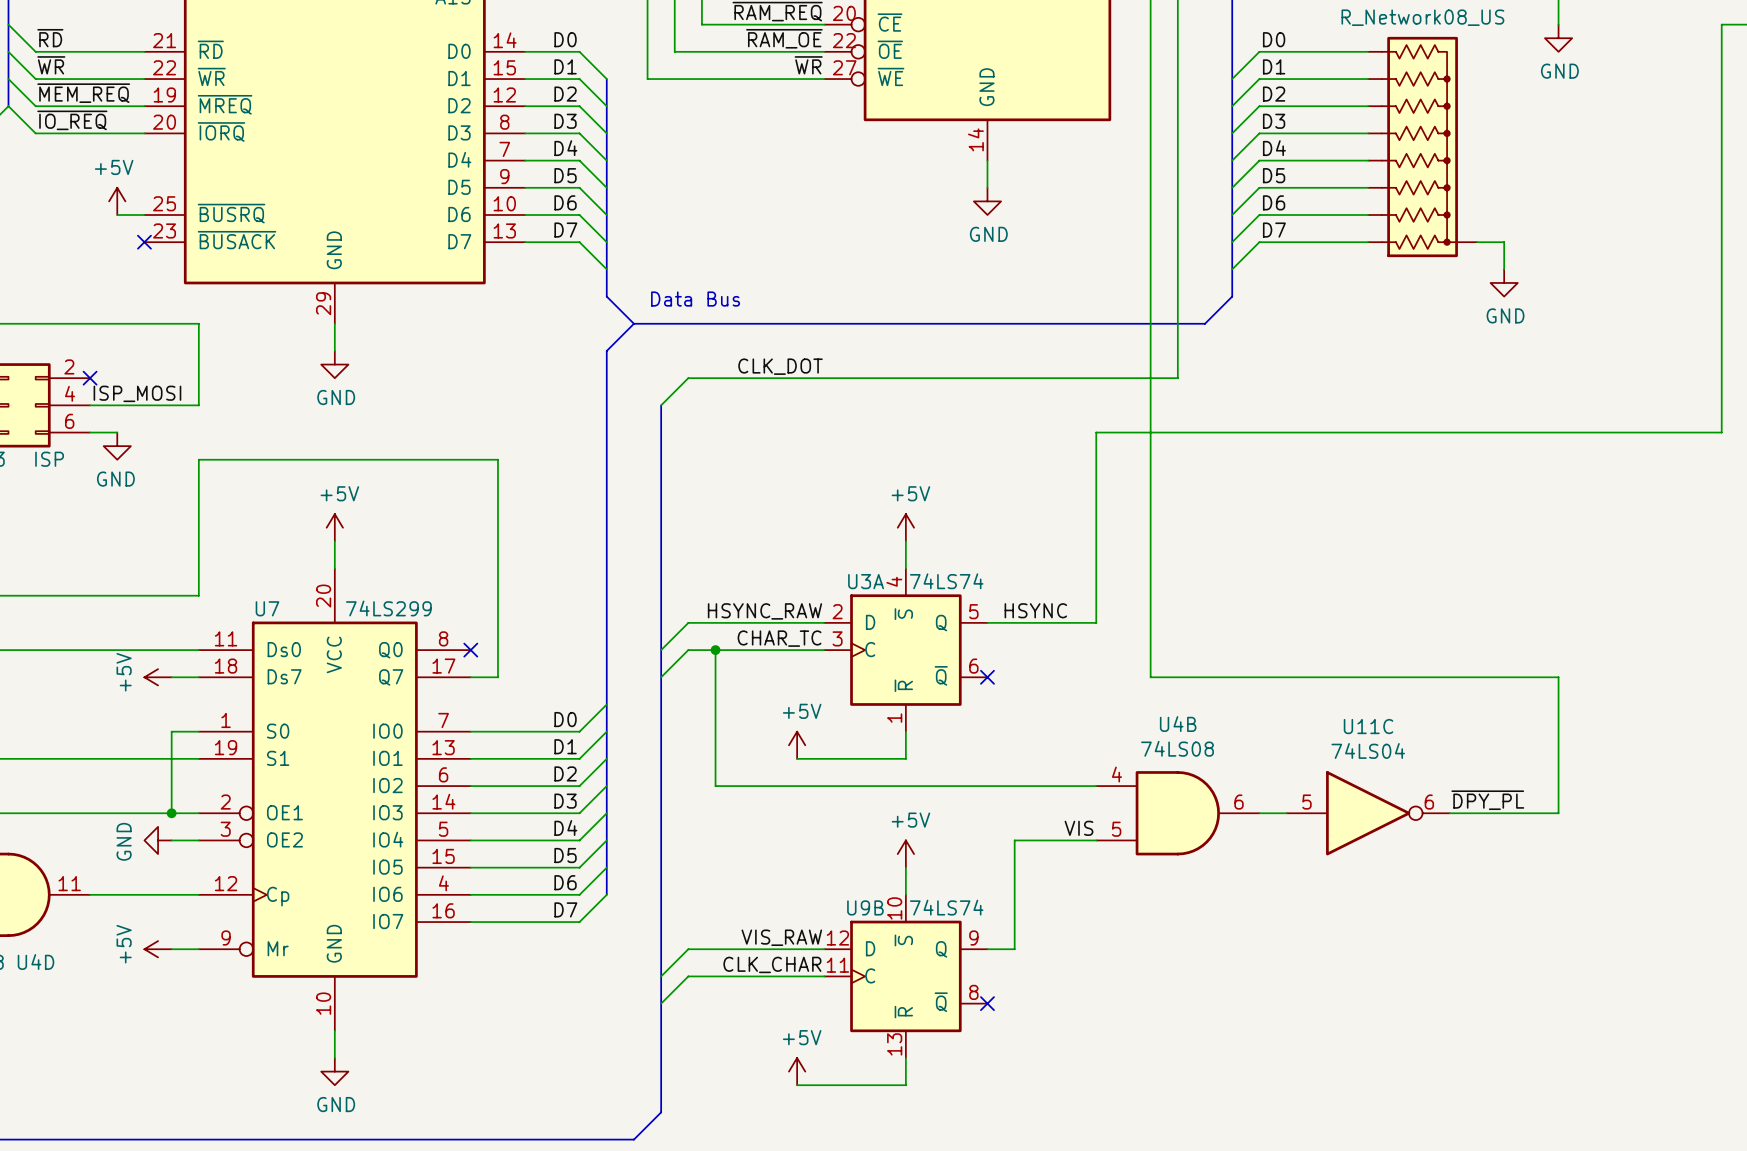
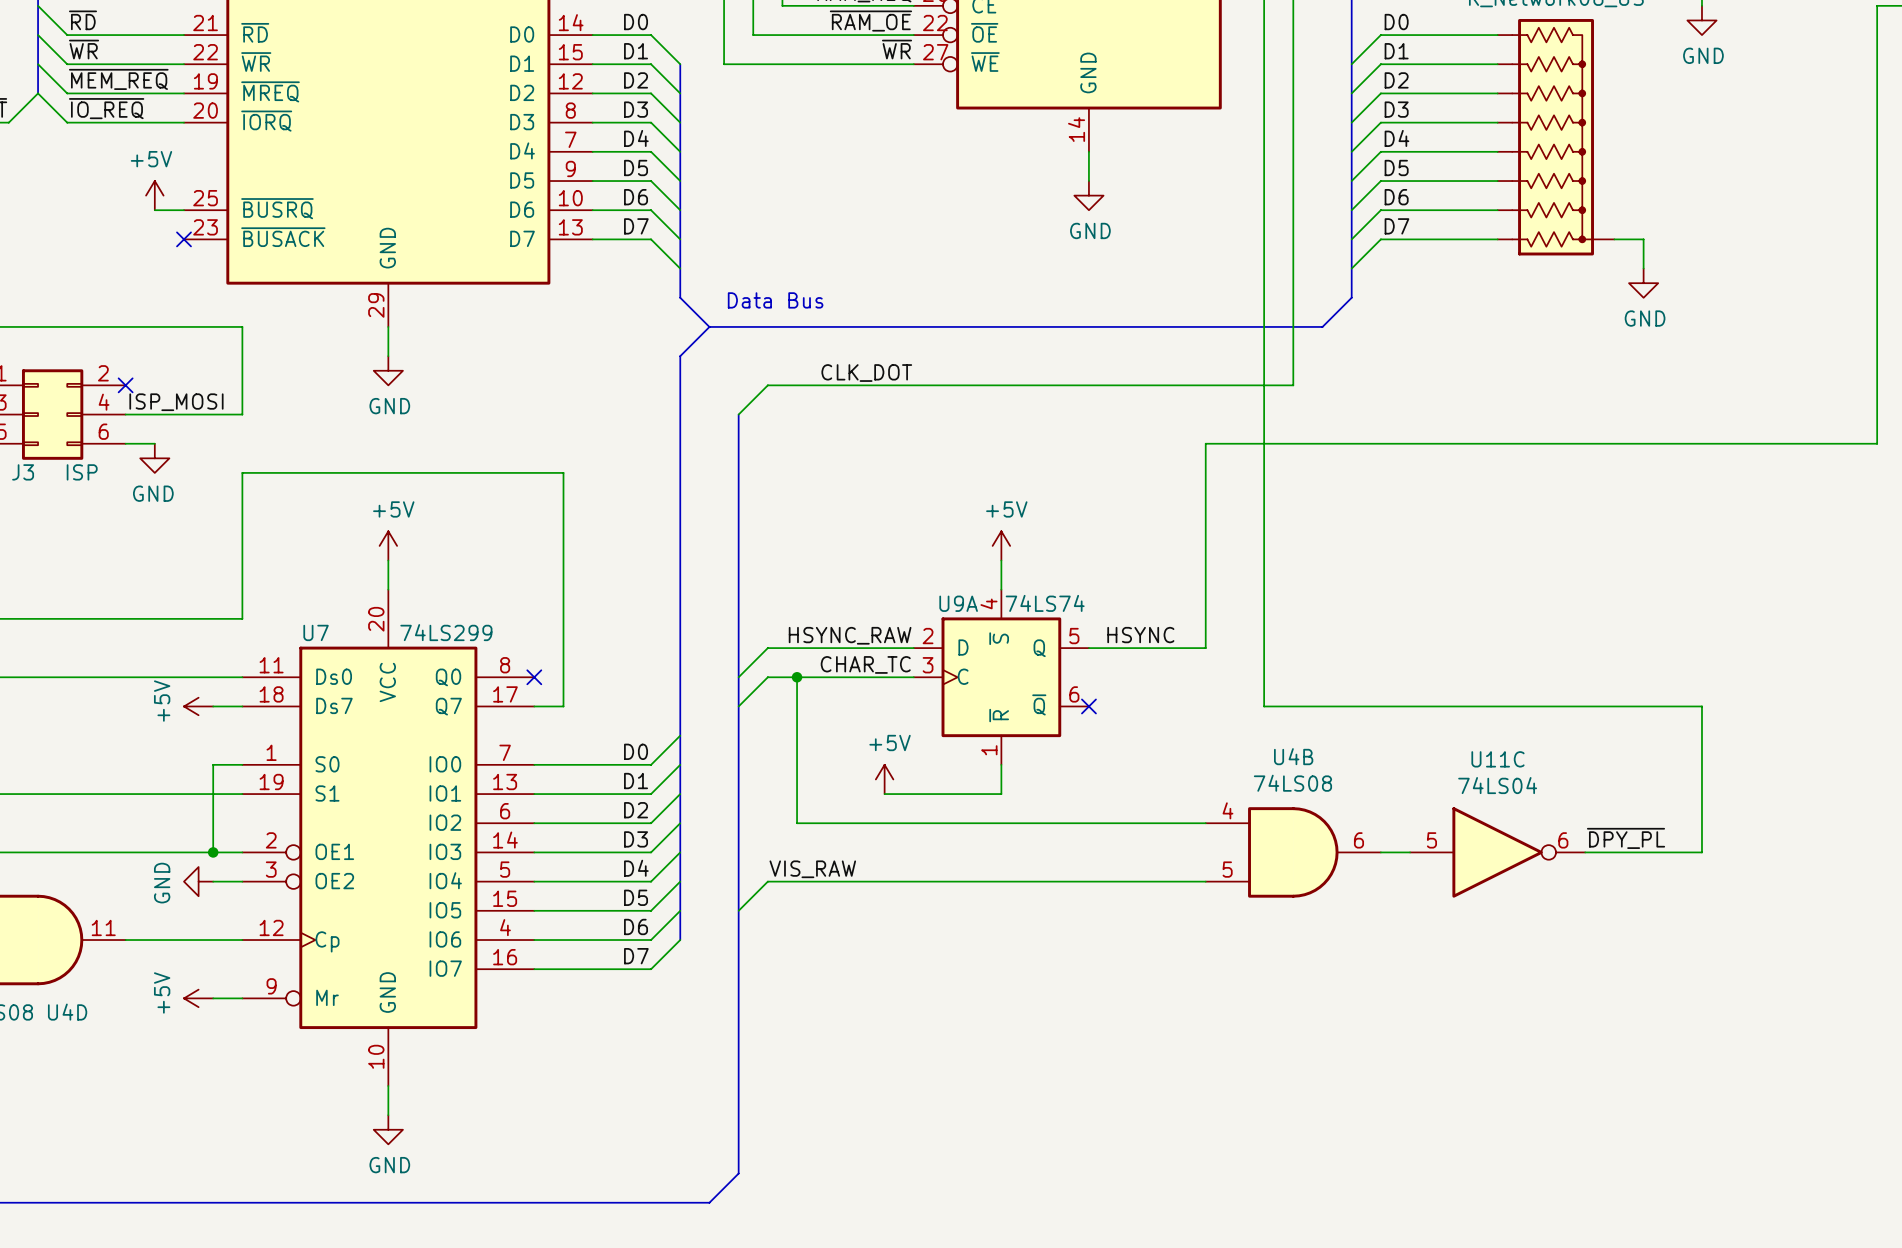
U3A name: U3A (866, 581) -> U9A (958, 603)
label: VIS (1078, 828) -> none
wire: (1014, 840) (1014, 949) (987, 949) -> (1118, 881) (767, 881) (738, 910)
power symbol: +5V (905, 854) -> none
wire: (905, 867) (905, 894) -> none
label position: VIS_RAW (781, 937) -> VIS_RAW (812, 869)
wire: (824, 949) (688, 949) (661, 976) -> none
label: CLK_CHAR (772, 964) -> none
wire: (824, 976) (688, 976) (661, 1003) -> none
U9B: 74LS74 (905, 976) -> none
no-connect mark: (987, 1003) -> none
wire: (905, 1058) (905, 1085) (797, 1085) -> none
power symbol: +5V (797, 1071) -> none

